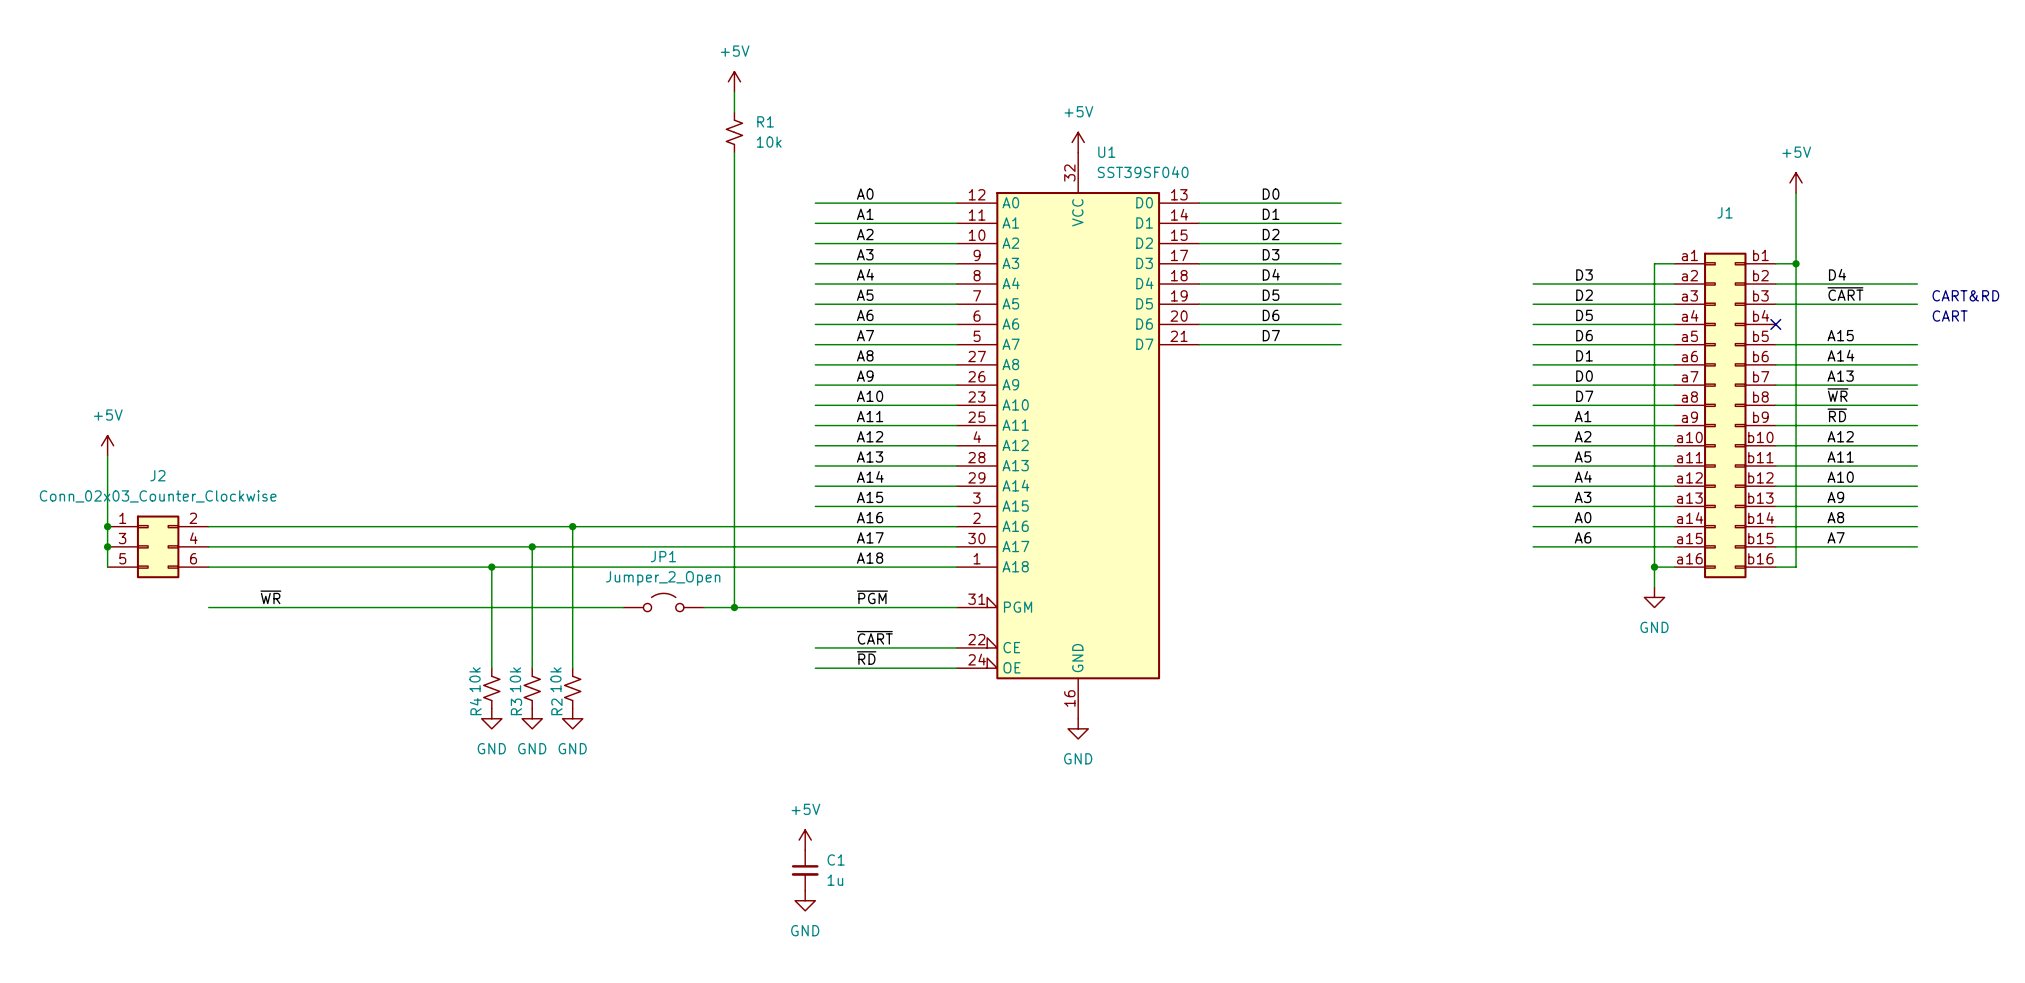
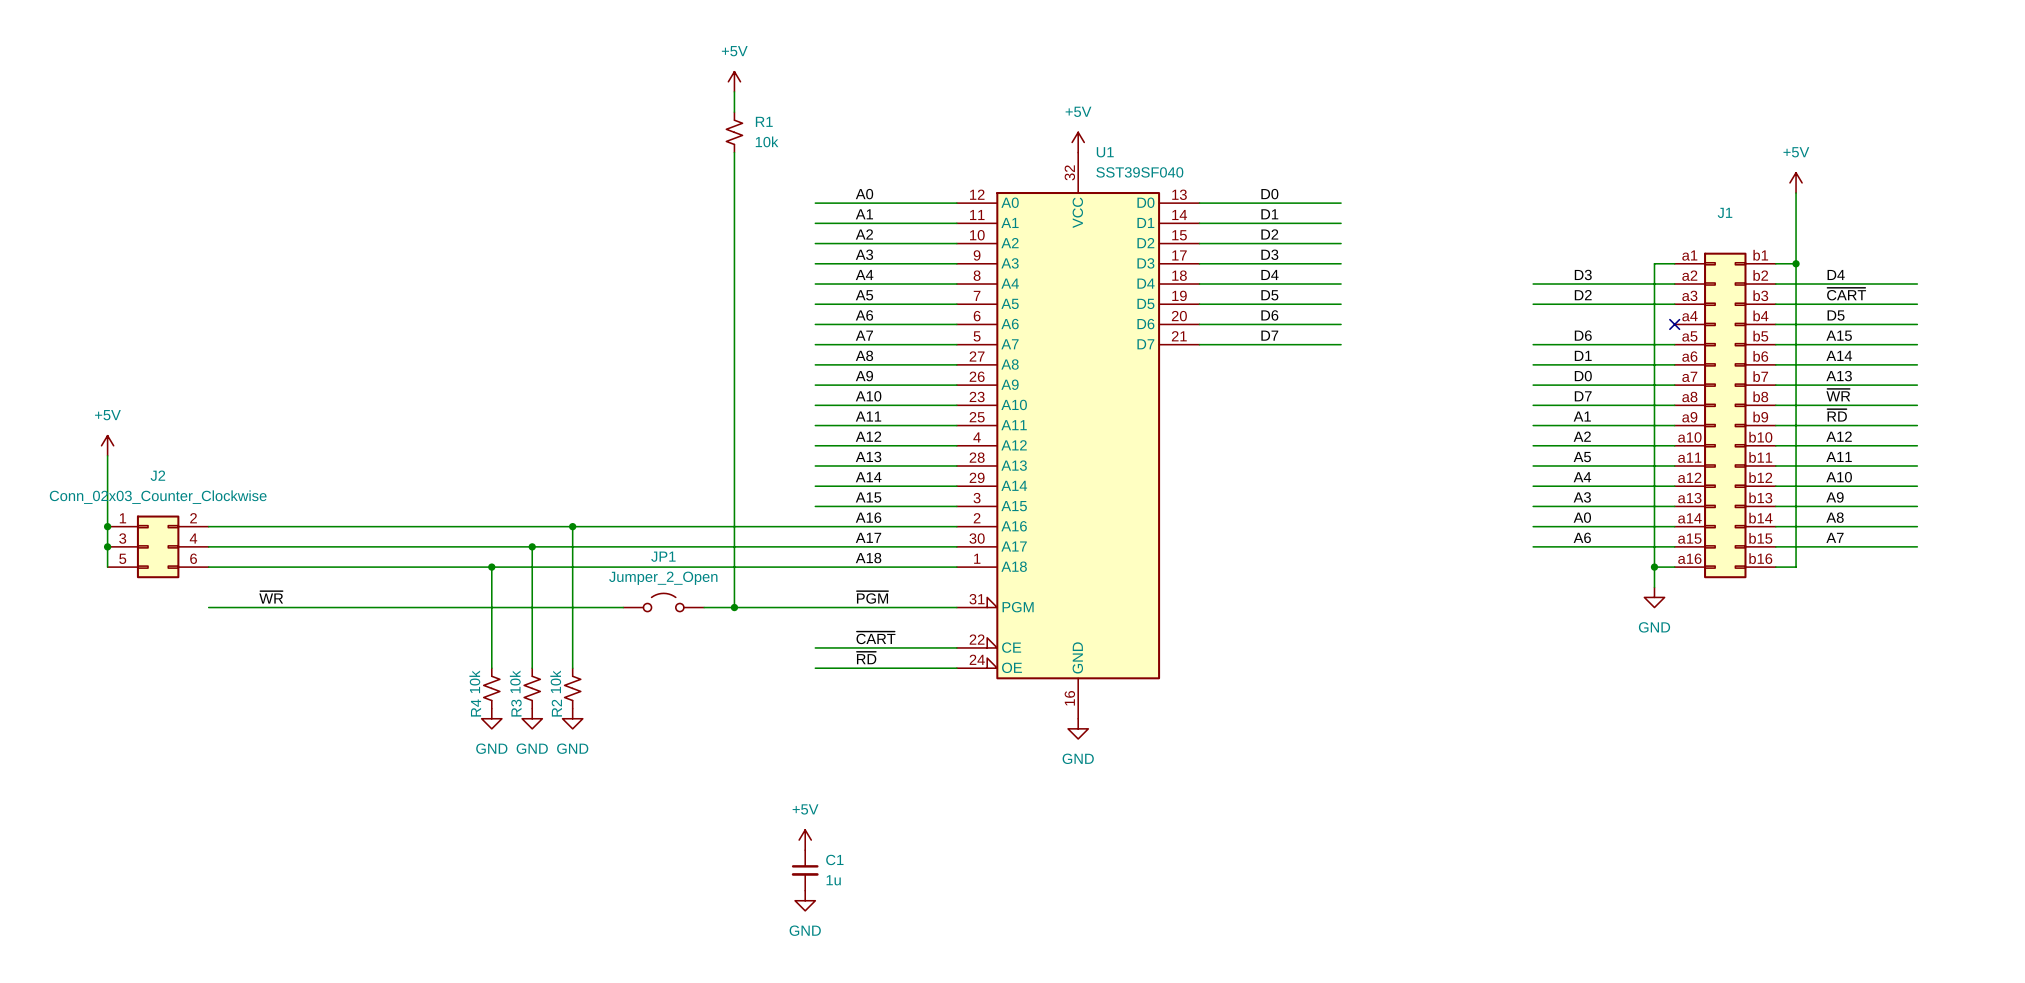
text: CART&RD (1965, 295) -> none
label: D5 (1584, 315) -> none
label: none -> D5 (1836, 315)
text: CART (1950, 316) -> none
wire: (1533, 324) (1674, 324) -> none
no-connect mark: none -> (1674, 324)
wire: none -> (1775, 324) (1917, 324)
no-connect mark: (1775, 324) -> none

